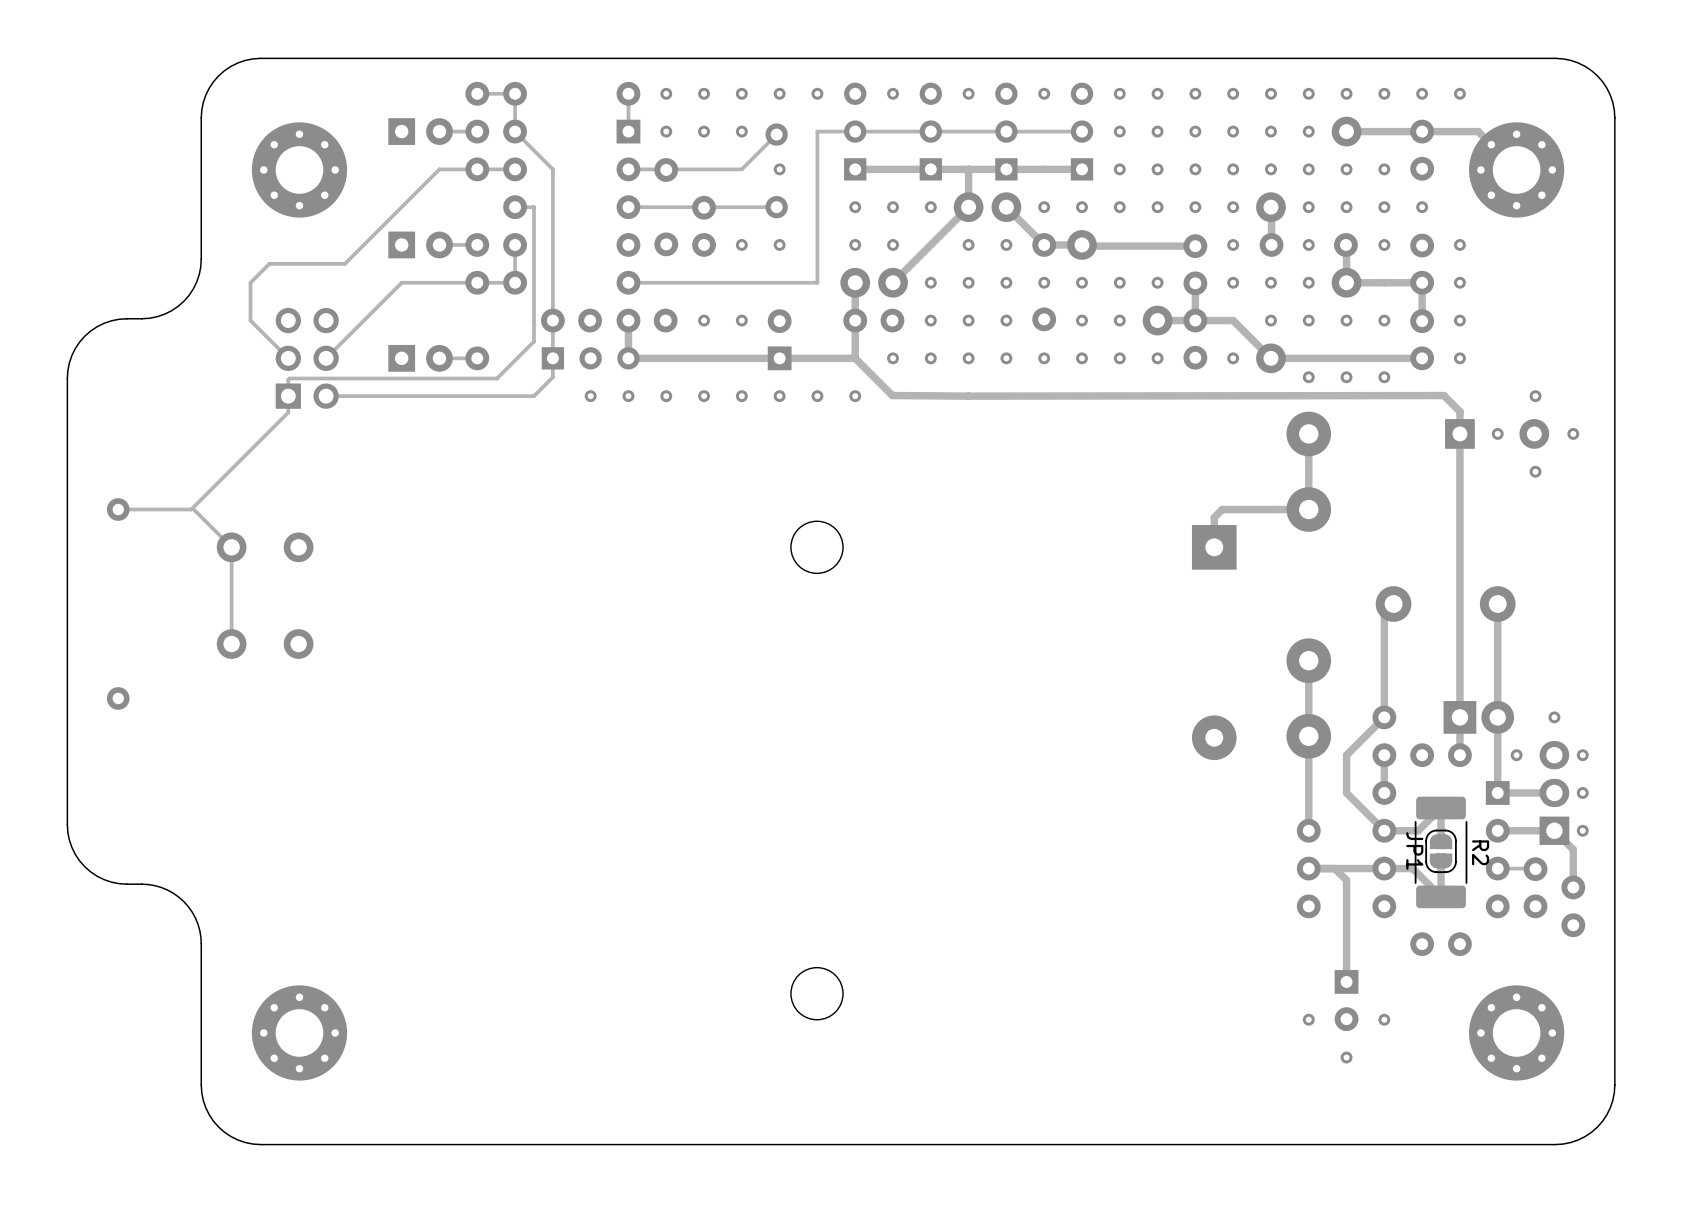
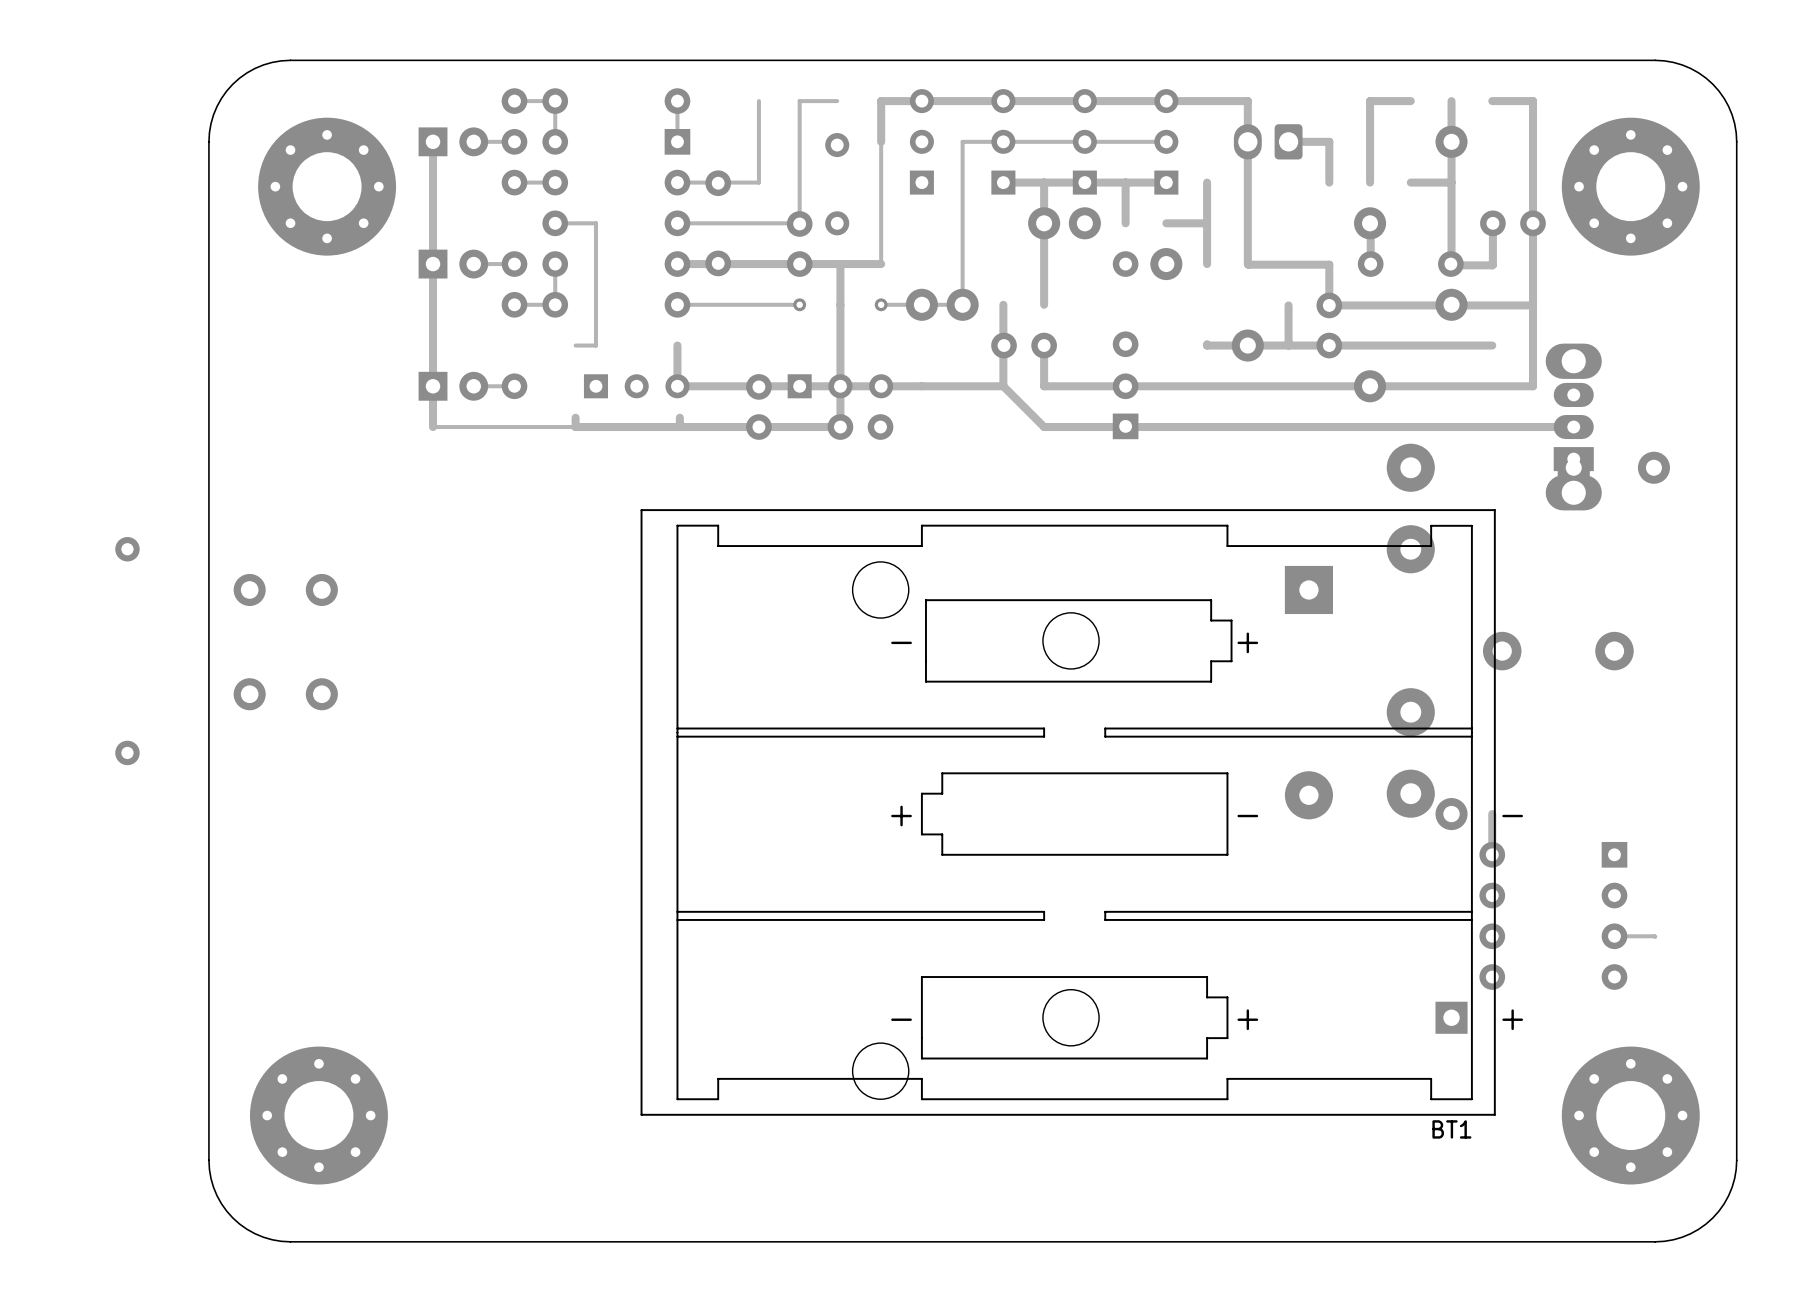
board edge: (1555, 58) (260, 58) (245, 60) (224, 70) (209, 88) (201, 110) (201, 259) (199, 274) (193, 289) (177, 306) (164, 314) (149, 318) (111, 320) (90, 331) (75, 348) (69, 362) (67, 378) (67, 832) (75, 854) (90, 871) (111, 882) (148, 884) (167, 890) (183, 901) (195, 917) (201, 943) (201, 1092) (205, 1107) (213, 1121) (231, 1136) (245, 1142) (260, 1144) (1555, 1144) (1578, 1140) (1591, 1132) (1602, 1121) (1610, 1107) (1614, 1085) (1614, 117) (1610, 95) (1597, 75) (1578, 62) (1555, 58) -> (1655, 60) (1673, 62) (1690, 68) (1712, 84) (1728, 106) (1734, 123) (1736, 141) (1736, 1160) (1734, 1178) (1728, 1195) (1718, 1211) (1706, 1224) (1682, 1237) (1655, 1241) (290, 1241) (272, 1239) (255, 1233) (239, 1224) (226, 1211) (213, 1187) (208, 1160) (208, 141) (210, 123) (217, 106) (226, 91) (239, 78) (263, 64) (290, 60) (1655, 60)
via: (666, 93) -> none
via: (704, 93) -> none
via: (741, 93) -> none
via: (779, 93) -> none
via: (817, 93) -> none
via: (893, 93) -> none
via: (968, 93) -> none
via: (1044, 93) -> none
via: (1119, 93) -> none
via: (1157, 93) -> none
via: (1195, 93) -> none
via: (1233, 93) -> none
via: (1270, 93) -> none
track: none -> (1410, 101) (1370, 101) (1370, 182)
via: (1308, 93) -> none
track: none -> (1451, 101) (1452, 265) (1492, 264) (1492, 223)
via: (1346, 93) -> none
track: none -> (1492, 101) (1533, 101) (1532, 305) (1329, 305) (1329, 264) (1248, 264) (1247, 101) (881, 101) (881, 141)
via: (1384, 93) -> none
via: (1422, 93) -> none
via: (1459, 93) -> none
part footprint: [251, 122, 348, 218] -> [258, 117, 397, 256]
part footprint: [1469, 122, 1565, 218] -> [1561, 117, 1700, 256]
track: (515, 131) (552, 169) (552, 207) -> (575, 223) (595, 223)
via: (666, 131) -> none
via: (704, 131) -> none
via: (741, 131) -> none
track: (893, 131) (817, 131) -> (962, 141) (962, 304) (881, 304)
via: (1119, 131) -> none
via: (1157, 131) -> none
part: none -> (1268, 141)
track: none -> (1288, 141) (1329, 141) (1329, 182)
via: (1195, 131) -> none
via: (1233, 131) -> none
via: (1270, 131) -> none
via: (1308, 131) -> none
track: (1346, 131) (1478, 131) (1516, 169) -> none
track: (776, 134) (741, 169) (704, 169) -> (758, 101) (758, 182)
part: (1422, 150) -> none
track: (477, 169) (439, 169) (345, 263) (269, 263) (250, 282) (250, 320) (288, 358) -> none
via: (779, 169) -> none
track: (930, 169) (855, 169) -> (1003, 386) (921, 386)
track: none -> (1125, 182) (1125, 223)
track: none -> (1207, 182) (1207, 264)
via: (1119, 169) -> none
via: (1157, 169) -> none
via: (1195, 169) -> none
via: (1233, 169) -> none
via: (1270, 169) -> none
via: (1308, 169) -> none
track: none -> (1451, 182) (1410, 182)
via: (1346, 169) -> none
via: (1384, 169) -> none
track: (533, 207) (533, 341) (497, 378) (289, 378) (288, 412) (191, 509) (118, 509) -> none
track: (776, 207) (741, 207) -> (837, 101) (799, 101) (799, 223)
via: (855, 207) -> none
via: (893, 207) -> none
via: (930, 207) -> none
track: (968, 207) (893, 282) -> (1044, 223) (1044, 304)
track: (1006, 207) (1044, 244) (1195, 246) -> none
via: (1044, 207) -> none
via: (1081, 207) -> none
track: none -> (1207, 223) (1166, 223)
via: (1119, 207) -> none
via: (1157, 207) -> none
via: (1195, 207) -> none
via: (1233, 207) -> none
via: (1308, 207) -> none
via: (1346, 207) -> none
via: (1384, 207) -> none
part: none -> (1512, 223)
via: (1422, 207) -> none
part position: (704, 226) -> (799, 244)
via: (741, 244) -> none
track: none -> (840, 264) (840, 427) (575, 427) (575, 417)
via: (779, 244) -> none
track: (817, 244) (817, 282) (741, 282) -> (881, 264) (677, 264)
via: (855, 244) -> none
via: (893, 244) -> none
via: (968, 244) -> none
via: (1006, 244) -> none
via: (1233, 244) -> none
via: (1308, 244) -> none
track: (1345, 244) (1346, 282) (1422, 282) -> none
via: (1384, 244) -> none
via: (1459, 244) -> none
part: (1195, 264) -> none
part: (1422, 264) -> none
track: (477, 282) (401, 282) (326, 358) -> none
via: none -> (799, 304)
via: none -> (881, 304)
track: (855, 282) (855, 358) (892, 395) (1443, 395) (1459, 411) (1459, 755) -> none
track: none -> (1003, 304) (1003, 386)
via: (930, 282) -> none
via: (968, 282) -> none
via: (1006, 282) -> none
via: (1044, 282) -> none
via: (1081, 282) -> none
via: (1119, 282) -> none
via: (1157, 282) -> none
via: (1233, 282) -> none
via: (1270, 282) -> none
via: (1308, 282) -> none
via: (1459, 282) -> none
part: none -> (1329, 325)
track: none -> (1207, 344) (1247, 345)
track: (552, 320) (552, 377) (533, 396) -> (595, 345) (575, 345)
part: (571, 320) -> none
part: (647, 320) -> none
via: (704, 320) -> none
via: (741, 320) -> none
part: (873, 320) -> none
via: (930, 320) -> none
part: none -> (1024, 345)
track: none -> (1044, 345) (1044, 386) (1370, 386)
via: (968, 320) -> none
via: (1006, 320) -> none
via: (1081, 320) -> none
via: (1119, 320) -> none
track: (1233, 320) (1271, 357) -> (1329, 345) (1492, 345)
via: (1270, 320) -> none
via: (1308, 320) -> none
via: (1346, 320) -> none
via: (1384, 320) -> none
via: (1459, 320) -> none
track: none -> (1533, 346) (1533, 386)
part position: (779, 339) -> (1125, 406)
part: (1195, 339) -> none
part: (1422, 339) -> none
part: (307, 358) -> none
part: none -> (840, 386)
via: (893, 358) -> none
track: none -> (1003, 386) (1044, 427) (1573, 427)
via: (930, 358) -> none
via: (968, 358) -> none
via: (1006, 358) -> none
via: (1044, 358) -> none
via: (1081, 358) -> none
via: (1119, 358) -> none
via: (1157, 358) -> none
via: (1233, 358) -> none
via: (1459, 358) -> none
part: none -> (758, 406)
via: (1308, 377) -> none
via: (1346, 377) -> none
via: (1384, 377) -> none
track: none -> (679, 417) (679, 424) (677, 427)
track: (401, 396) (326, 396) -> (433, 427) (433, 141)
via: (590, 396) -> none
via: (628, 396) -> none
via: (666, 396) -> none
via: (704, 396) -> none
via: (741, 396) -> none
via: (779, 396) -> none
part: none -> (860, 427)
via: (817, 396) -> none
via: (855, 396) -> none
part: none -> (1573, 427)
via: (1535, 396) -> none
track: (1308, 433) (1308, 509) (1222, 509) (1214, 517) (1214, 547) -> none
via: (1497, 433) -> none
via: (1573, 433) -> none
via: (1535, 471) -> none
track: (193, 509) (231, 547) (231, 644) -> none
track: (1393, 604) (1384, 613) (1384, 717) (1346, 755) (1346, 792) (1384, 830) (1418, 830) (1441, 808) (1441, 841) -> none
track: (1497, 604) (1497, 792) (1554, 792) -> none
track: (1308, 660) (1308, 830) -> none
part: (1478, 717) -> none
via: (1554, 717) -> none
part: (1384, 736) -> none
BT1: none -> (1068, 812)
part: (1441, 755) -> none
via: (1516, 755) -> none
via: (1582, 755) -> none
part: (1554, 792) -> none
via: (1582, 792) -> none
track: (1497, 830) (1554, 830) (1573, 849) (1573, 887) -> none
via: (1582, 830) -> none
JP1: (1441, 851) -> none
R2: (1441, 852) -> none
track: (1441, 861) (1441, 896) (1412, 868) (1308, 868) -> none
part: (1308, 868) -> none
track: (1334, 868) (1346, 880) (1346, 981) -> none
part: (1535, 887) -> none
part: (1573, 906) -> none
part: (1441, 944) -> none
part footprint: [251, 985, 348, 1081] -> [249, 1046, 388, 1185]
part footprint: [1469, 985, 1565, 1081] -> [1561, 1046, 1700, 1185]
part: (1346, 1000) -> none
via: (1308, 1019) -> none
via: (1384, 1019) -> none
via: (1346, 1057) -> none

